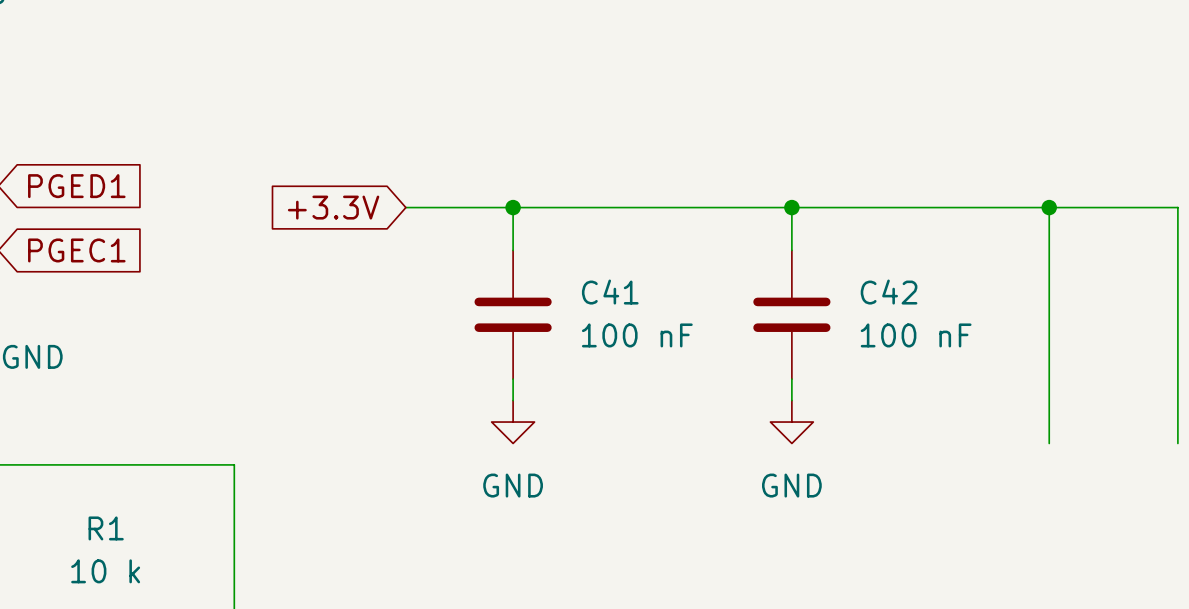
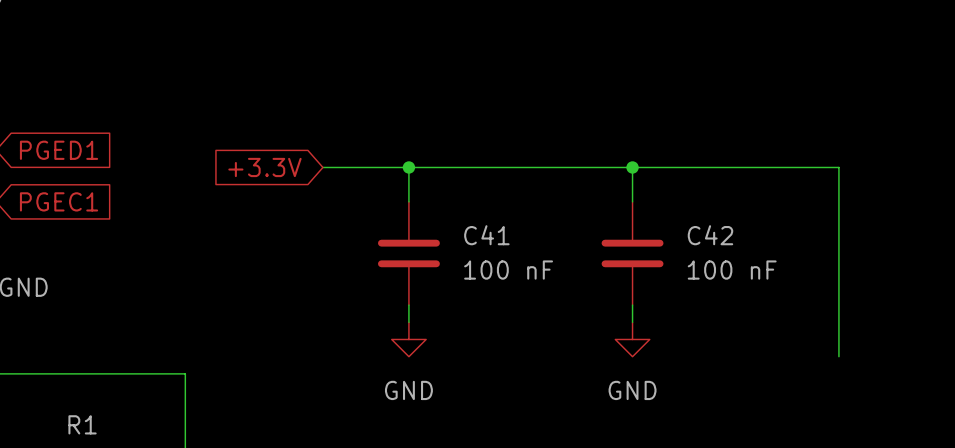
wire: (1049, 207) (1177, 207) (1177, 443) -> none
junction: (1049, 207) -> none

